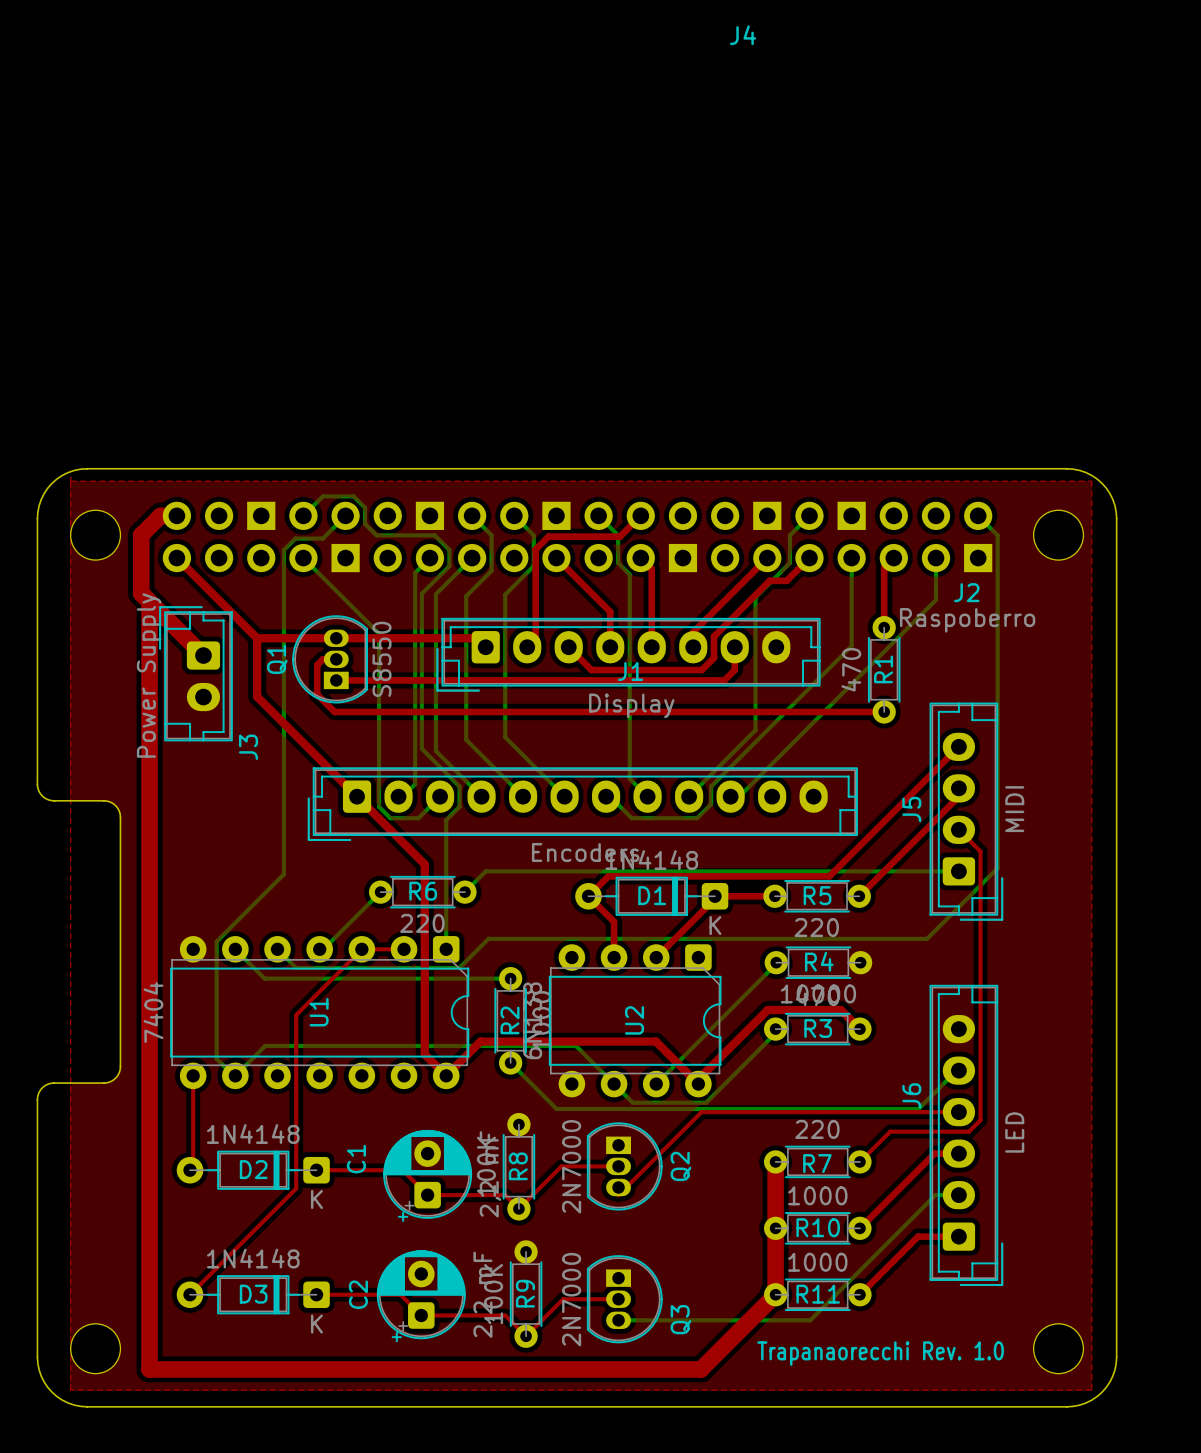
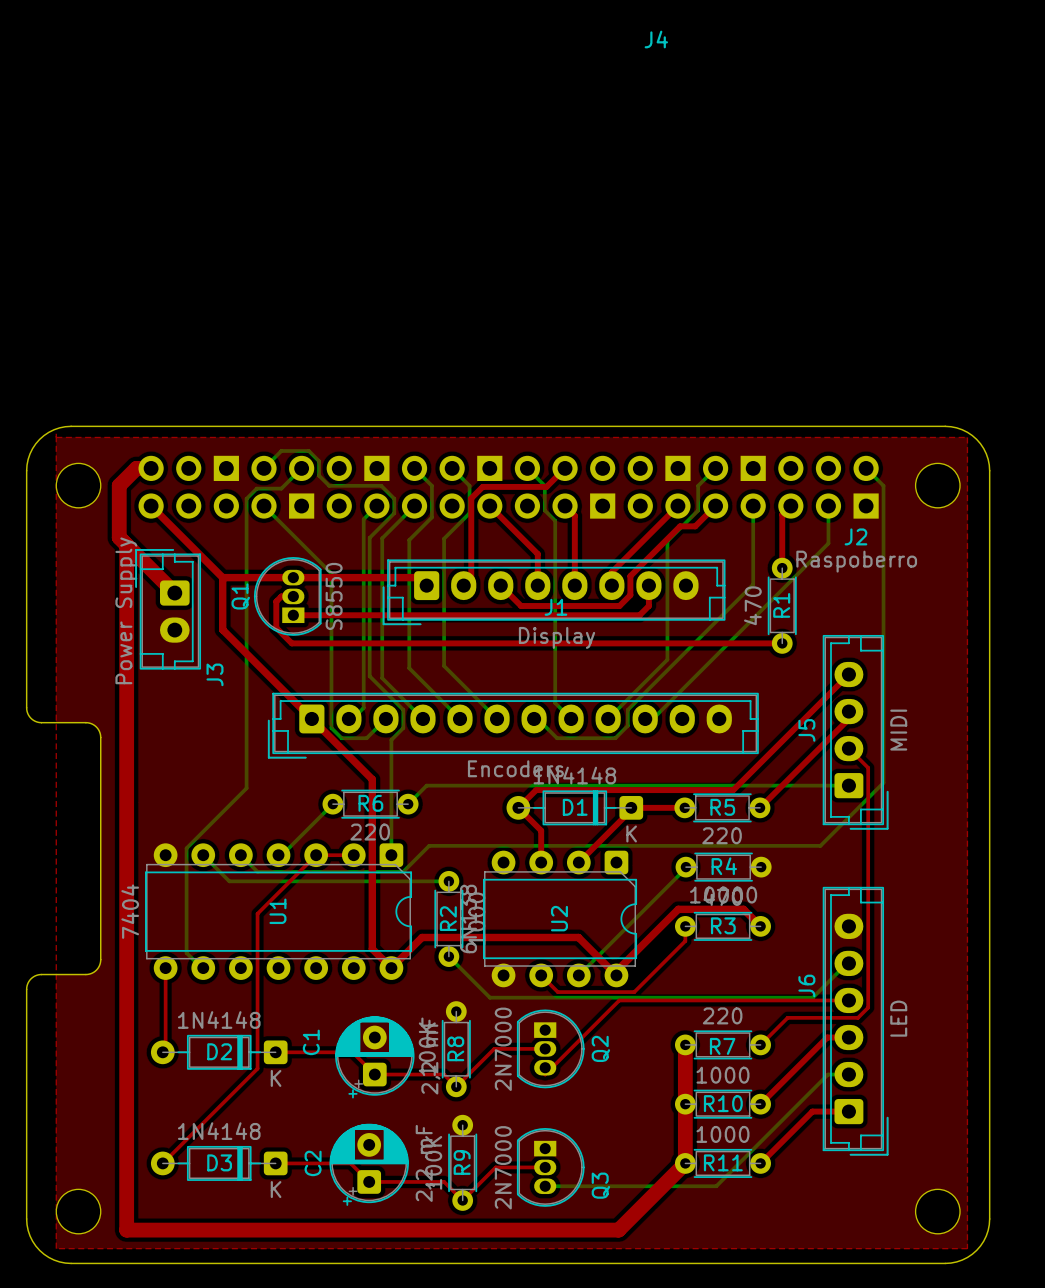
top track: none -> (685, 926) (685, 941) (634, 992) (557, 992) (541, 975)
bottom track: (775, 1029) (775, 1033) (706, 1102) (632, 1102) (575, 1045) (265, 1045) (235, 1075) -> none
text: Trapanaorecchi Rev. 1.0 (880, 1353) -> none

